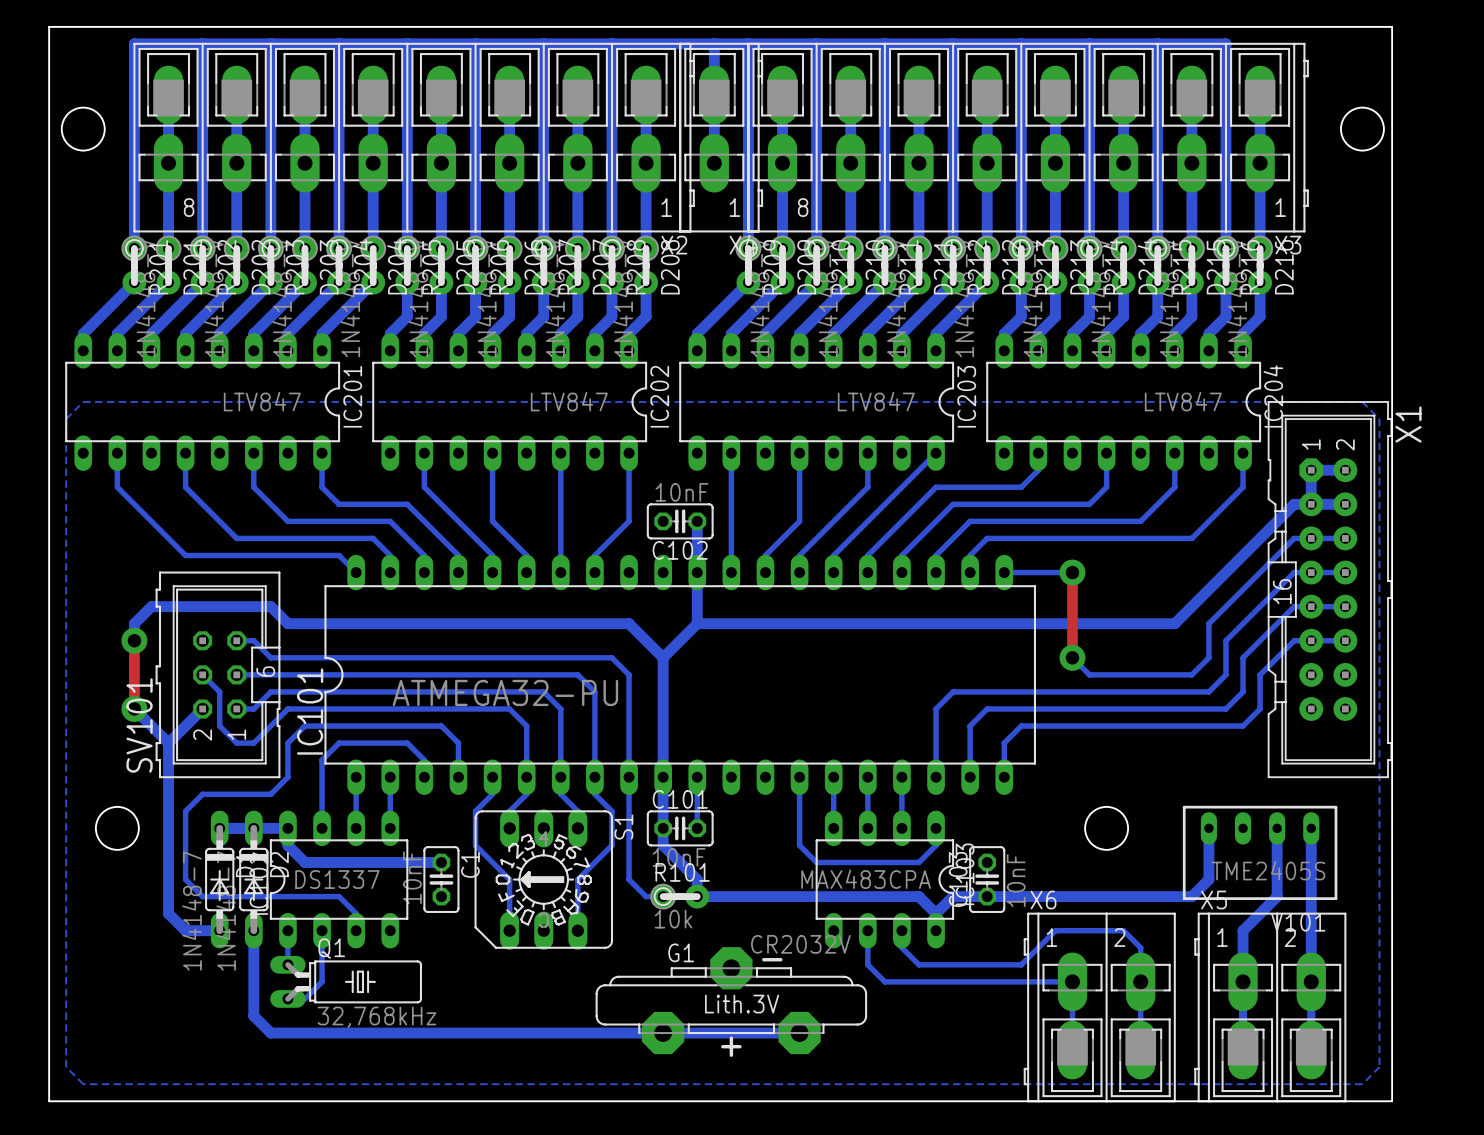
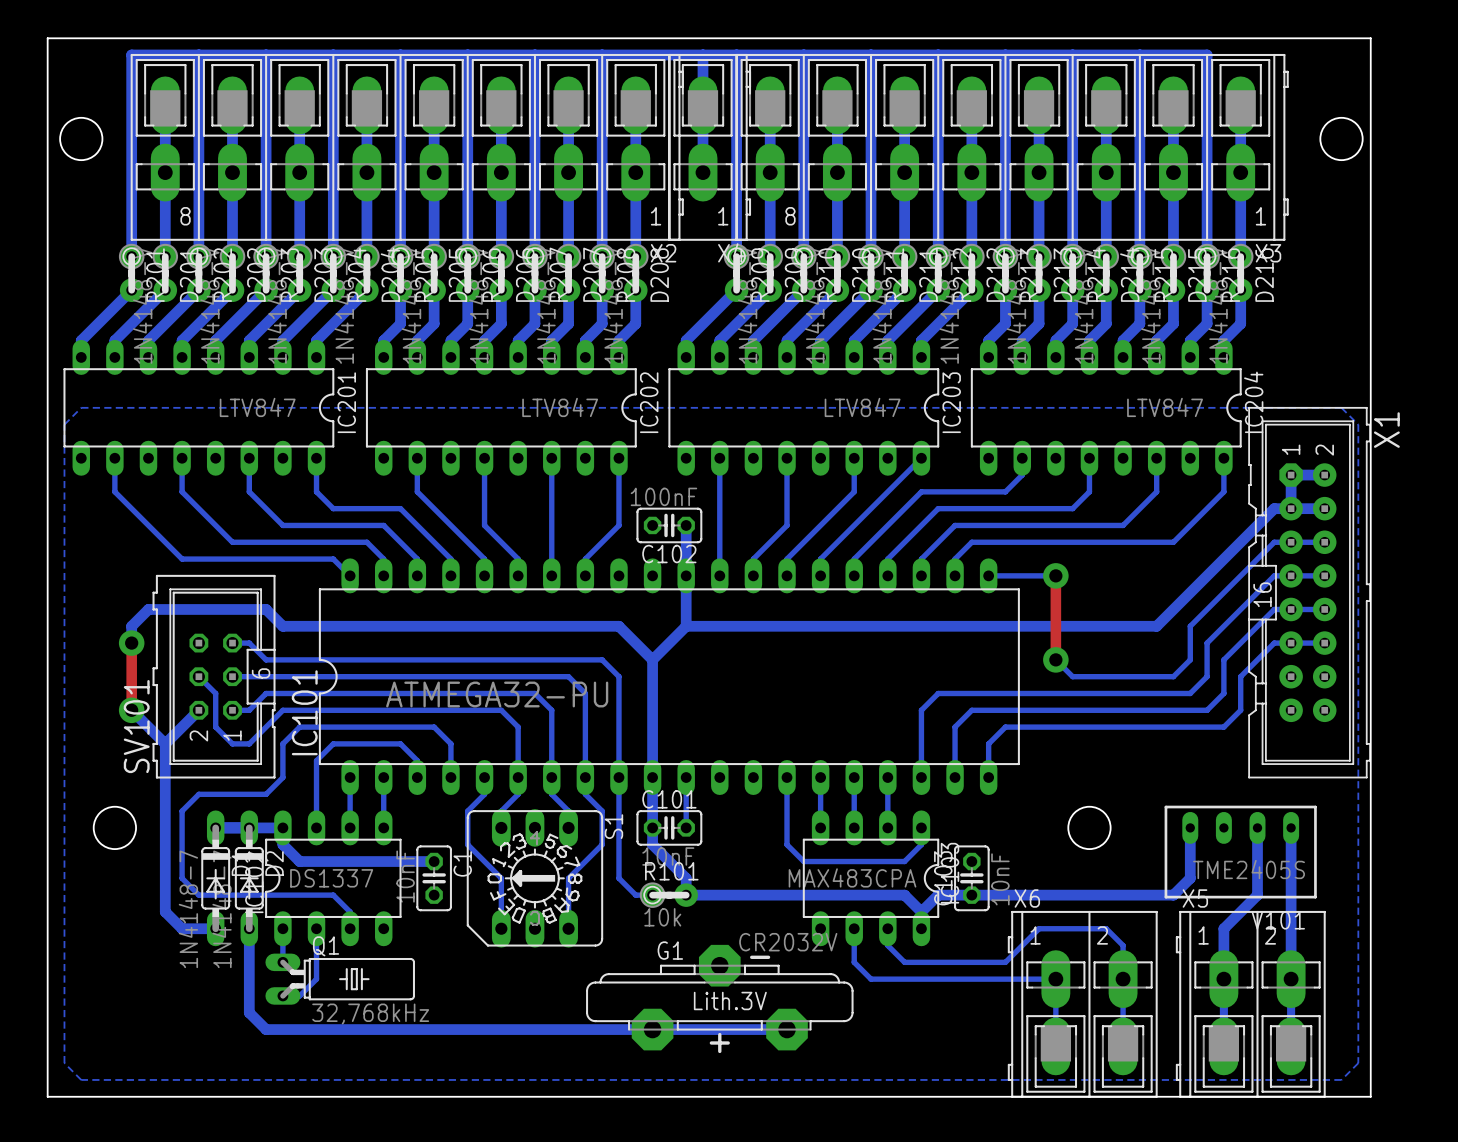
C102 value: 10nF (682, 492) -> 100nF (663, 496)

